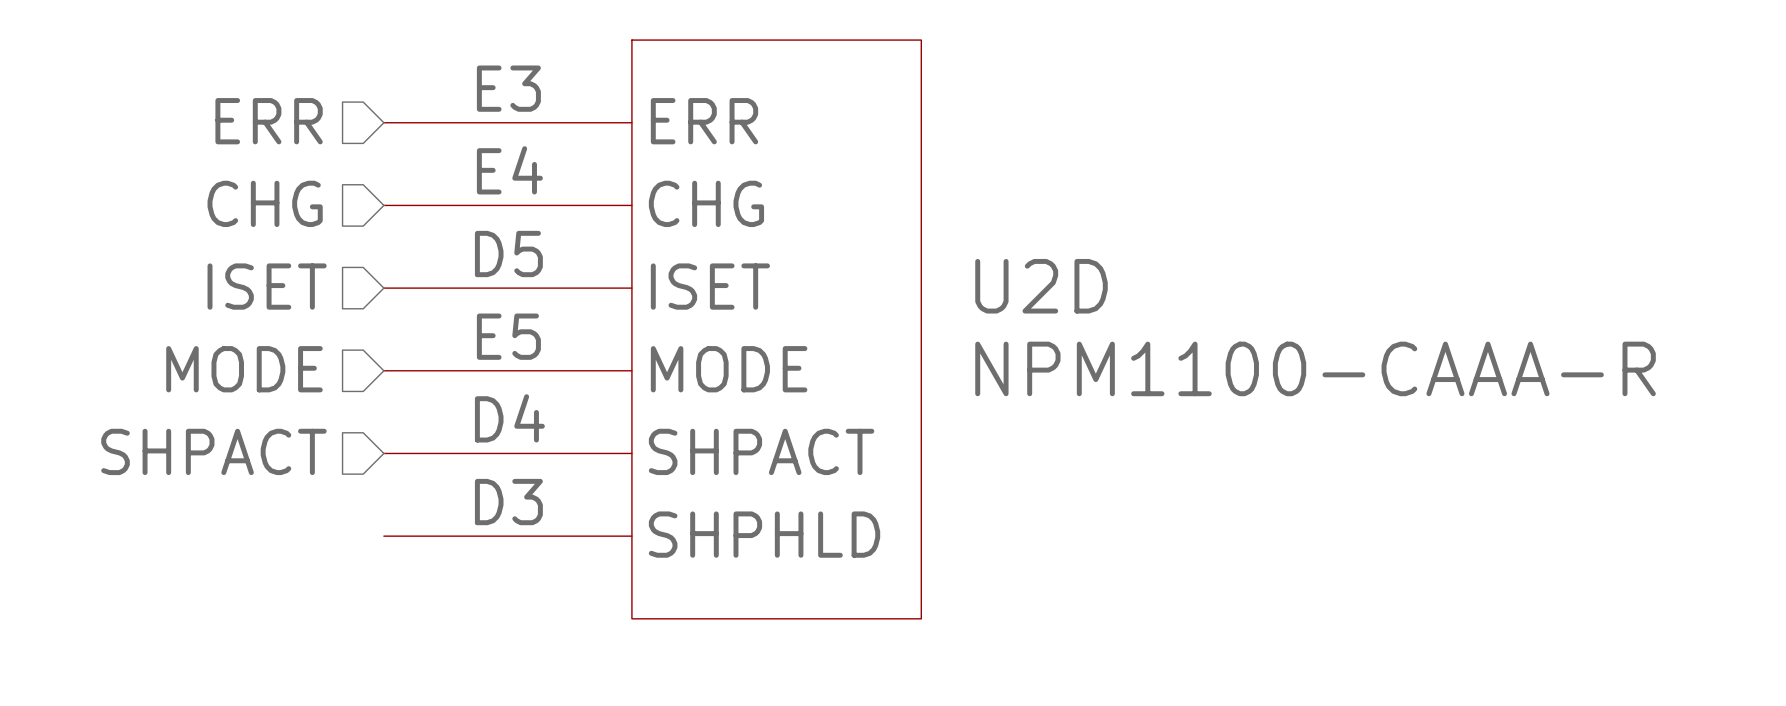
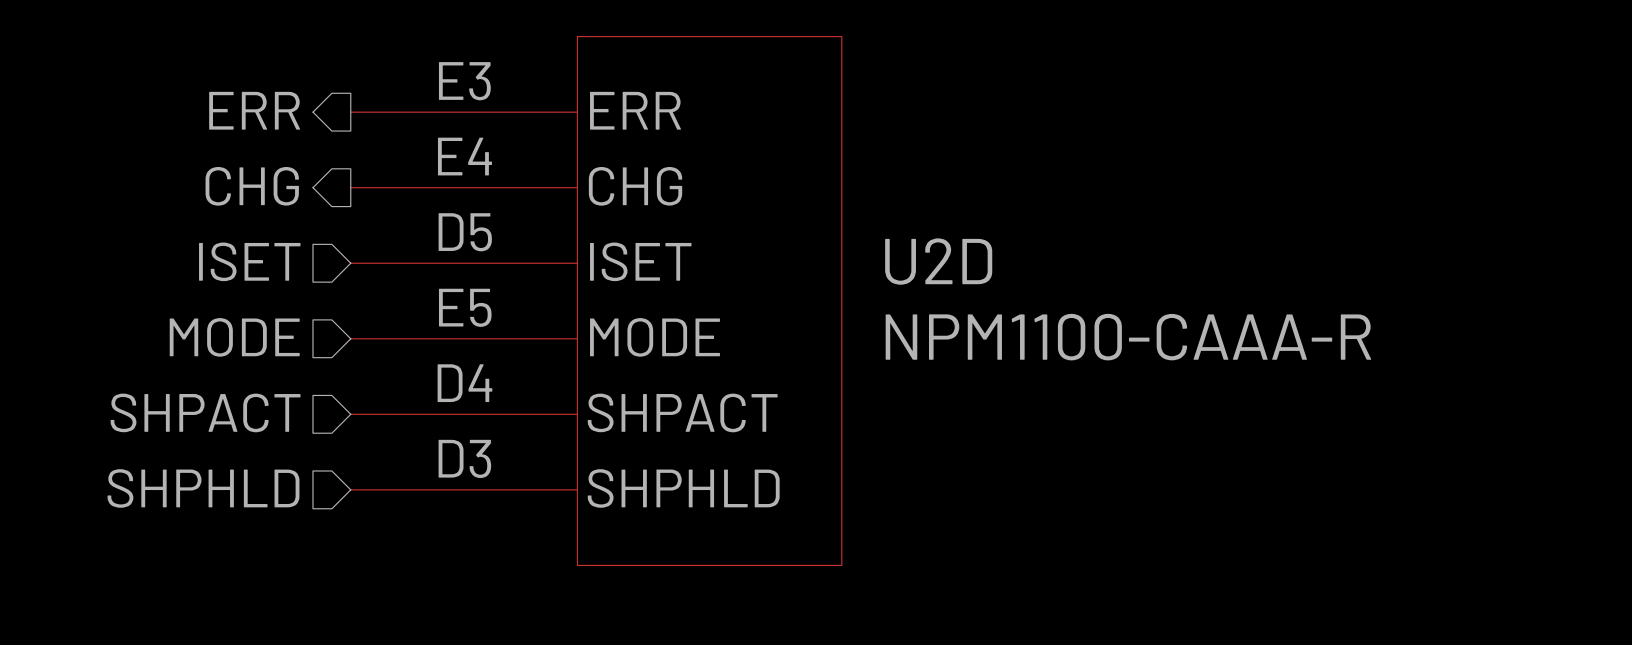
hierarchical label shape: input (269, 121) -> output (254, 110)
hierarchical label shape: input (265, 203) -> output (252, 186)
hierarchical label: none -> SHPHLD (203, 488)

